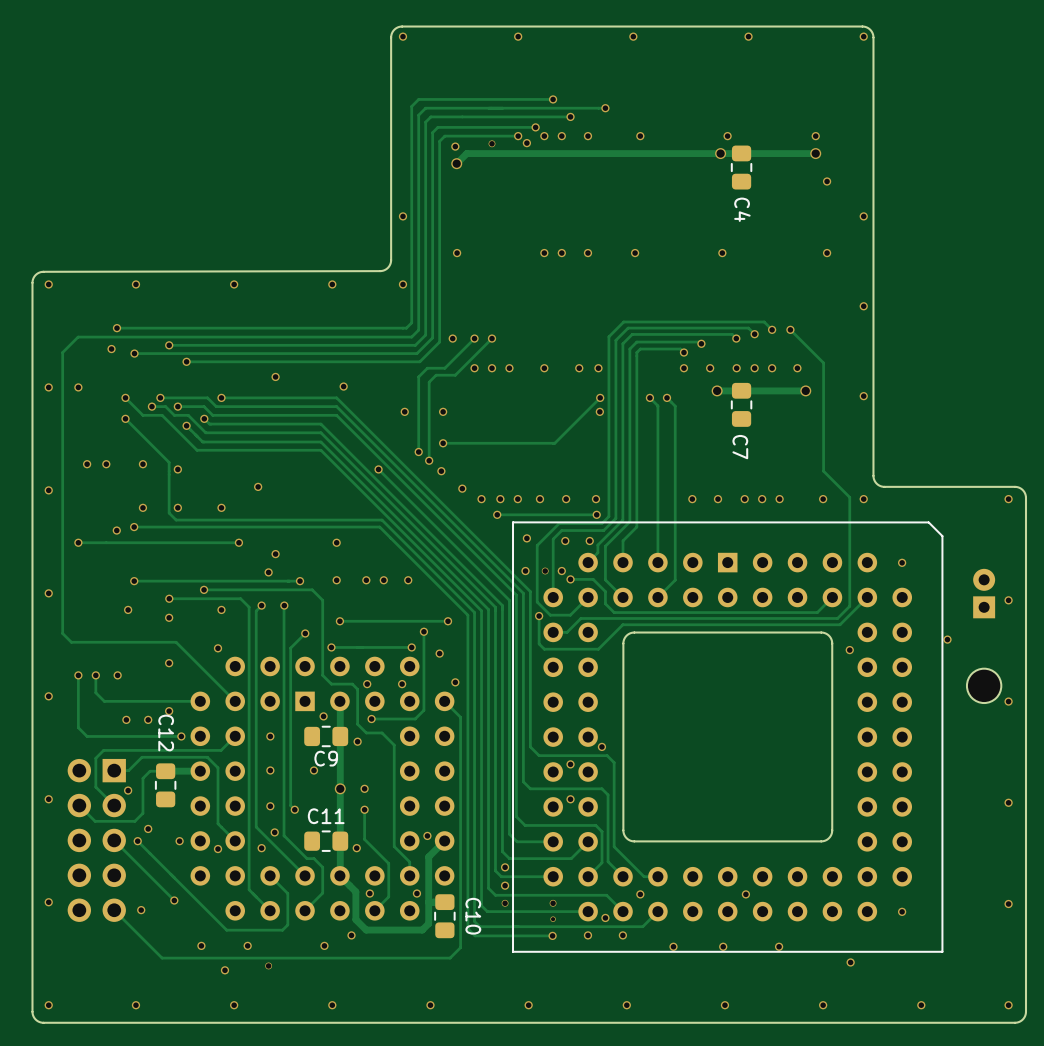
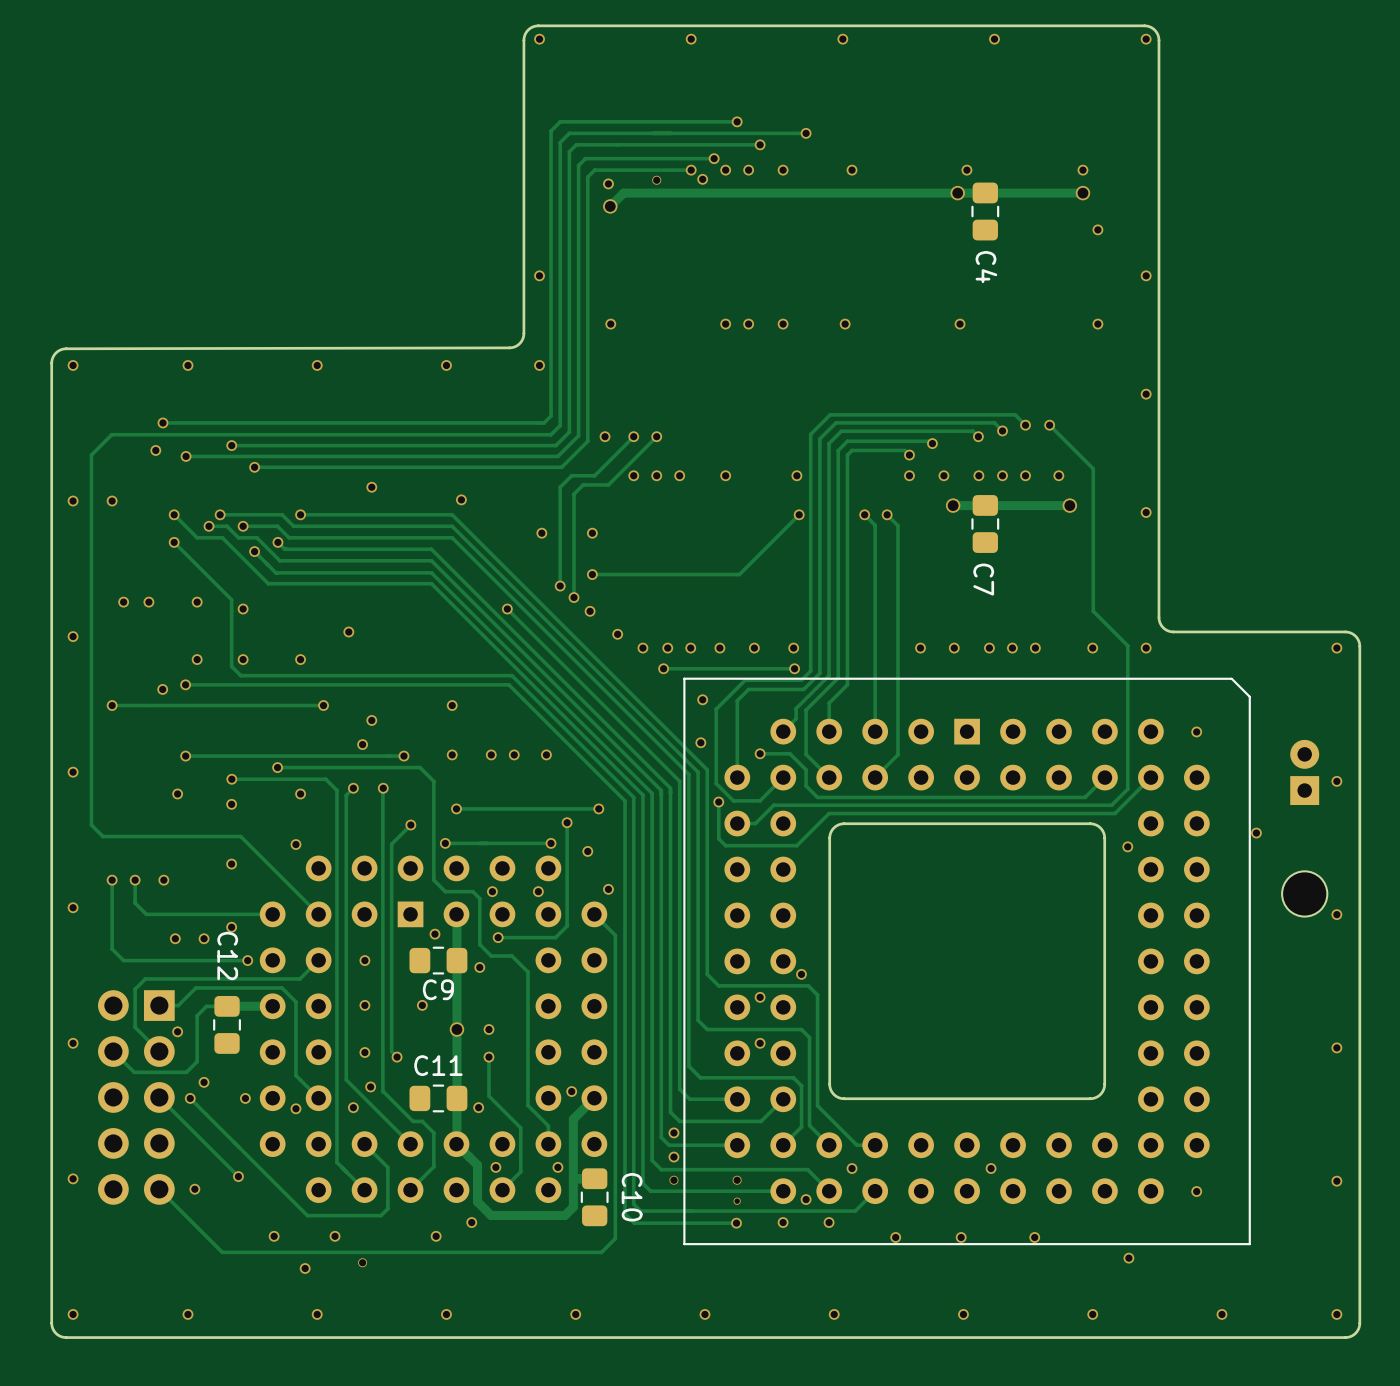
via: (579, 368) -> none
via: (599, 411) -> none
via: (565, 541) -> none
via: (589, 541) -> none
via: (545, 571) -> none
via: (561, 571) -> none

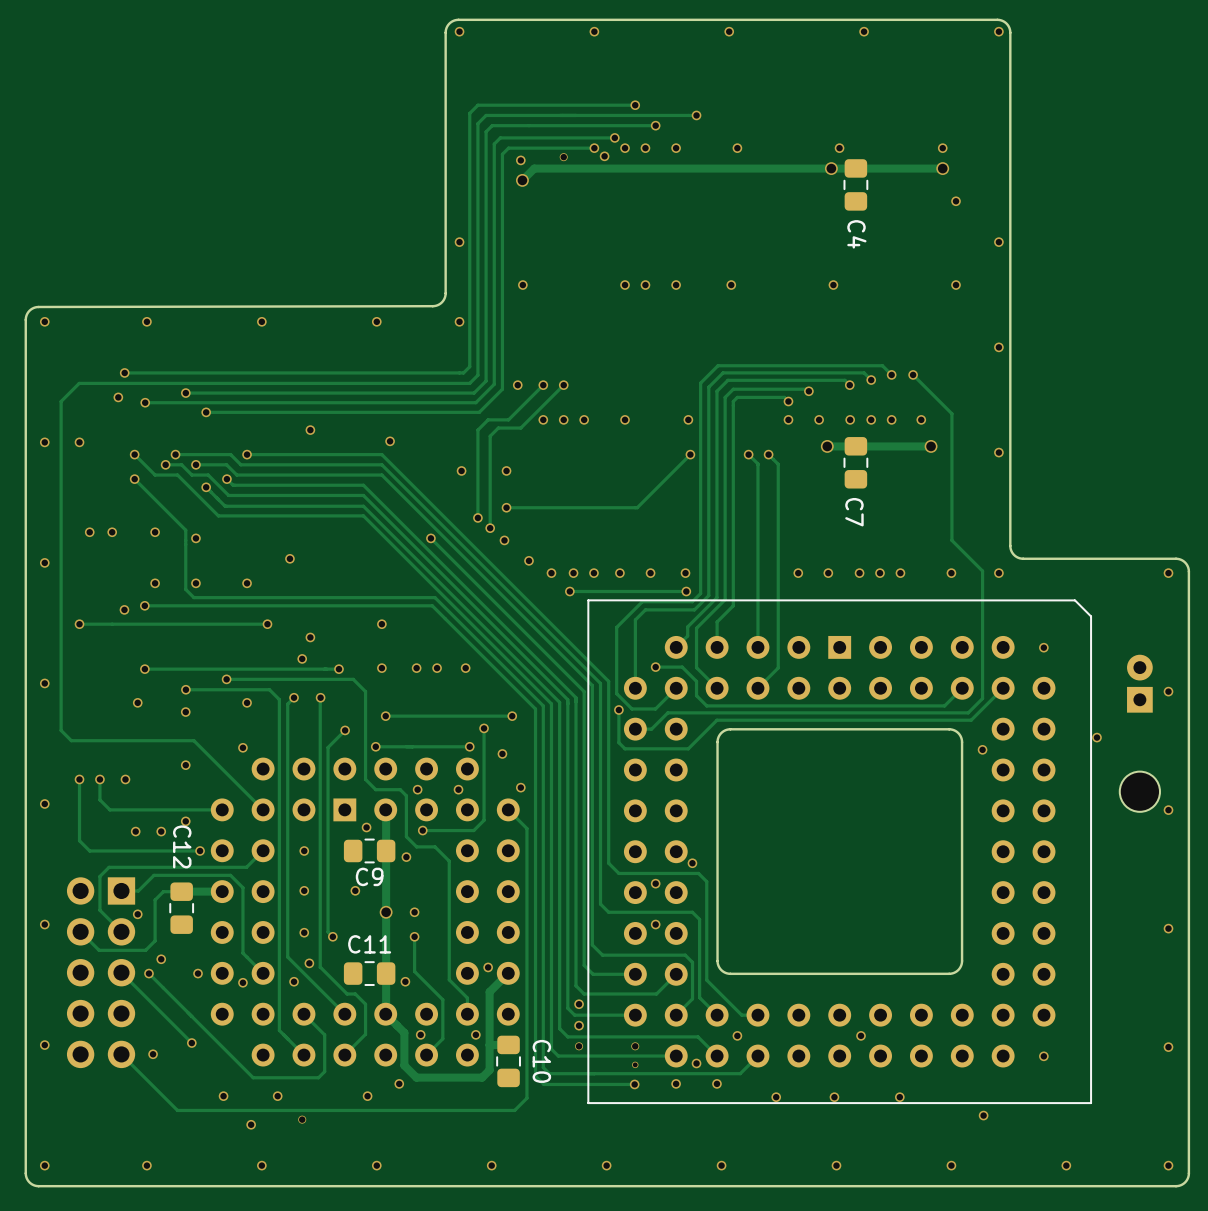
via: (702, 699) -> none
via: (700, 742) -> none

